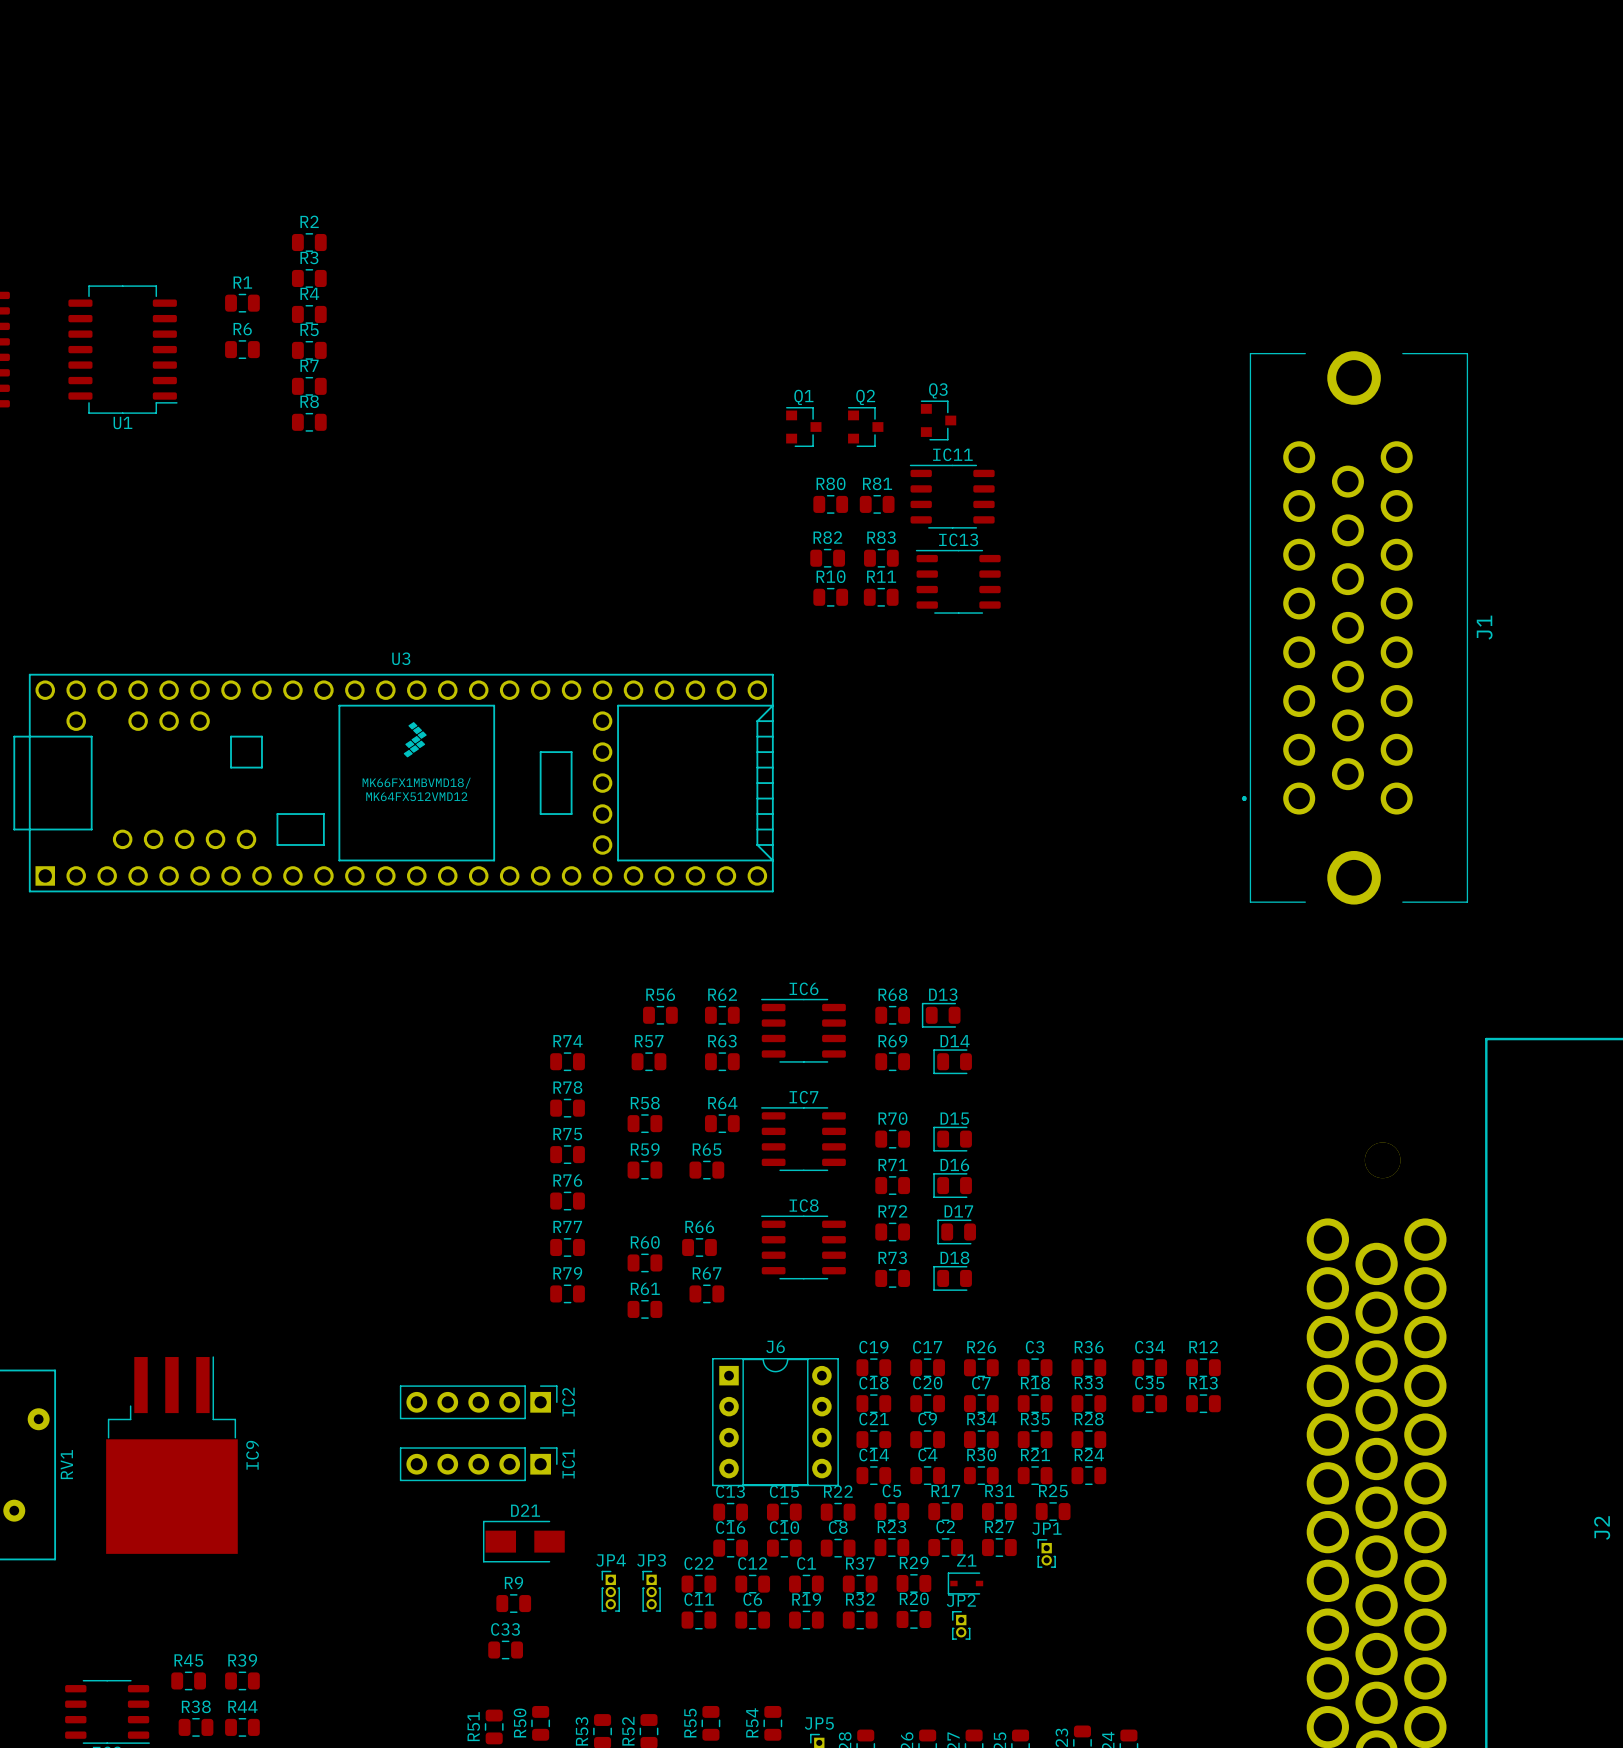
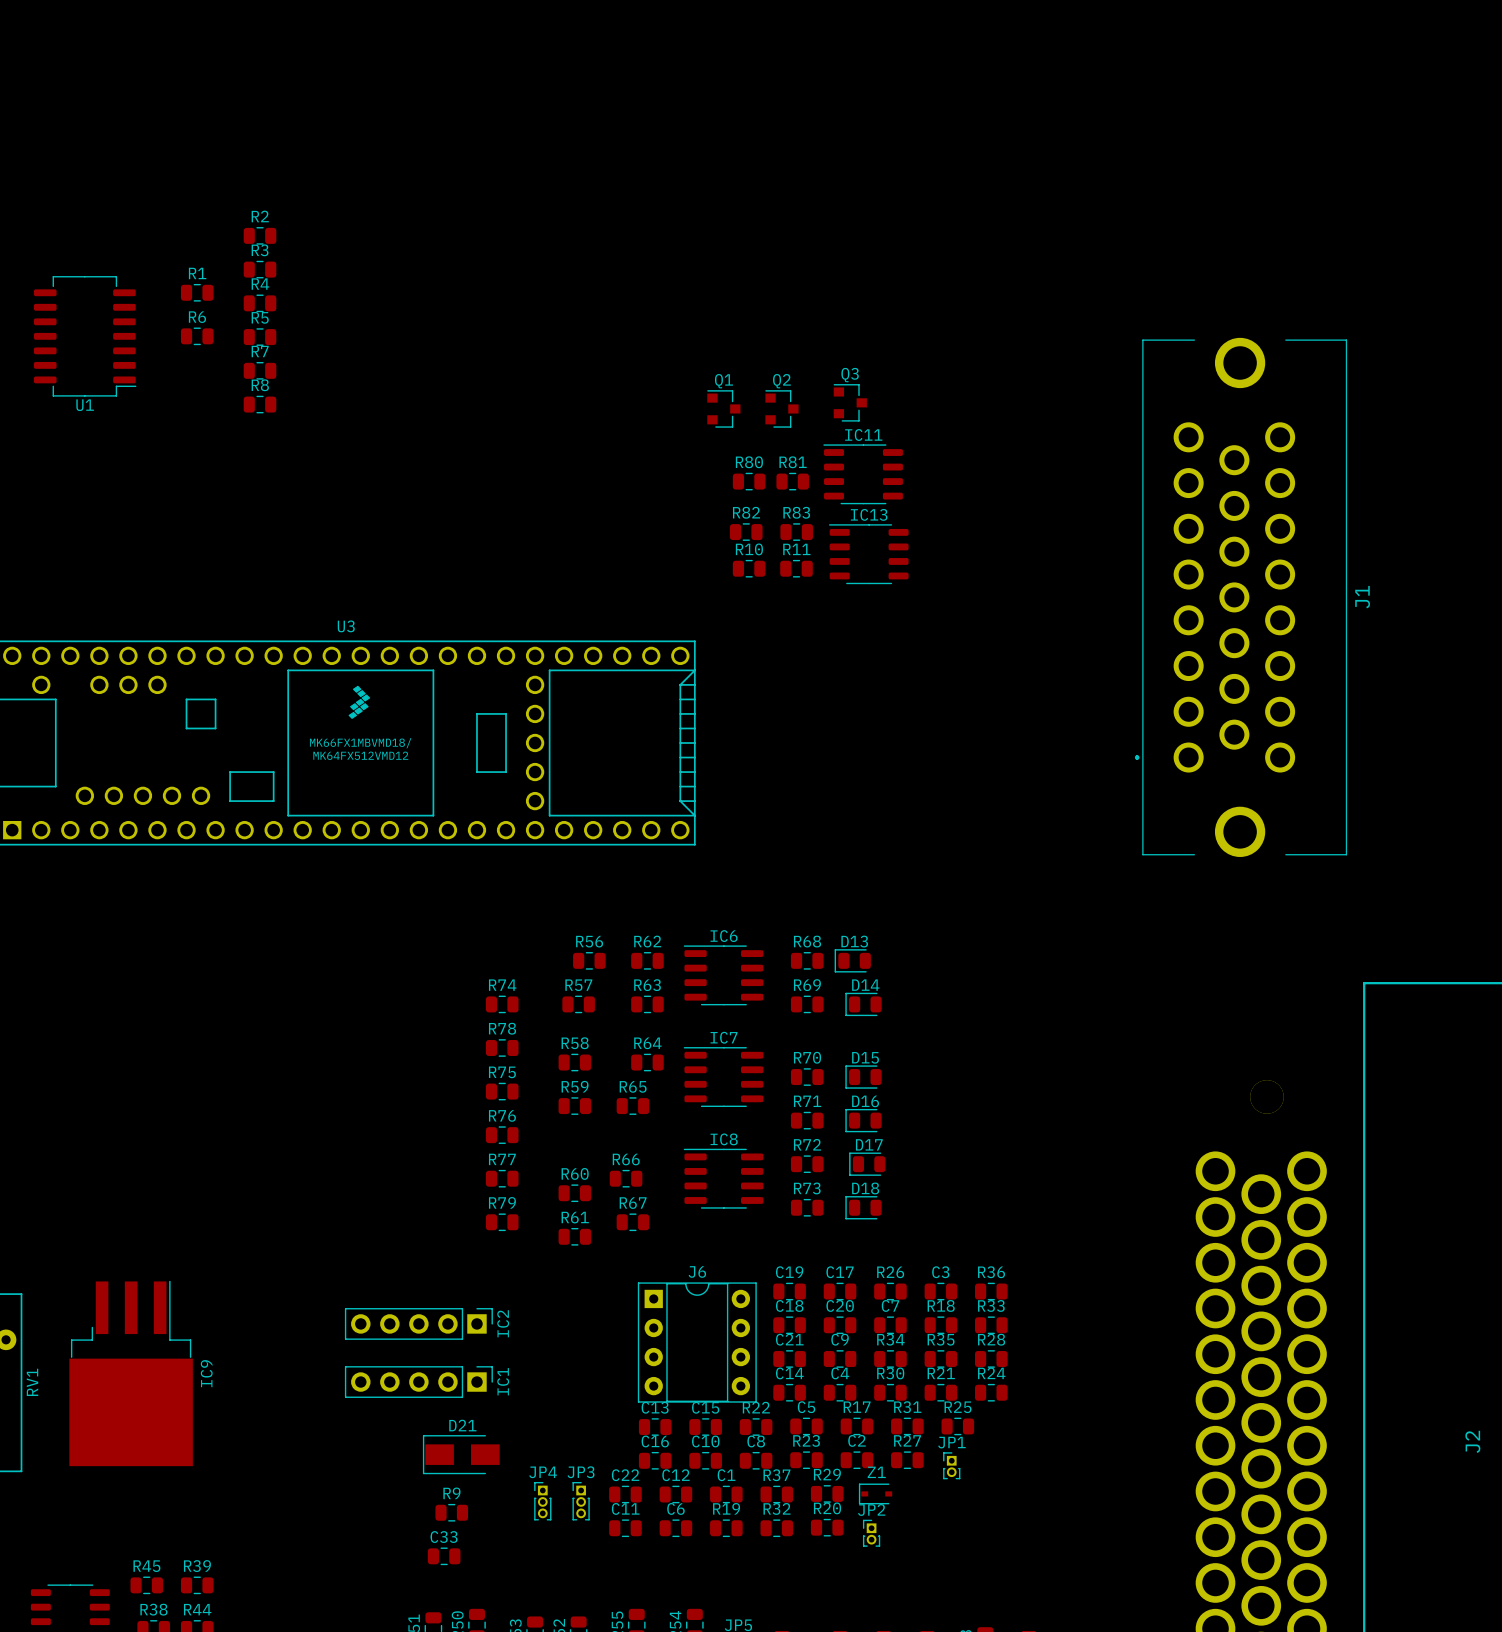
C34: (1149, 1367) -> none
R12: (1203, 1367) -> none
C35: (1149, 1403) -> none
R13: (1203, 1403) -> none

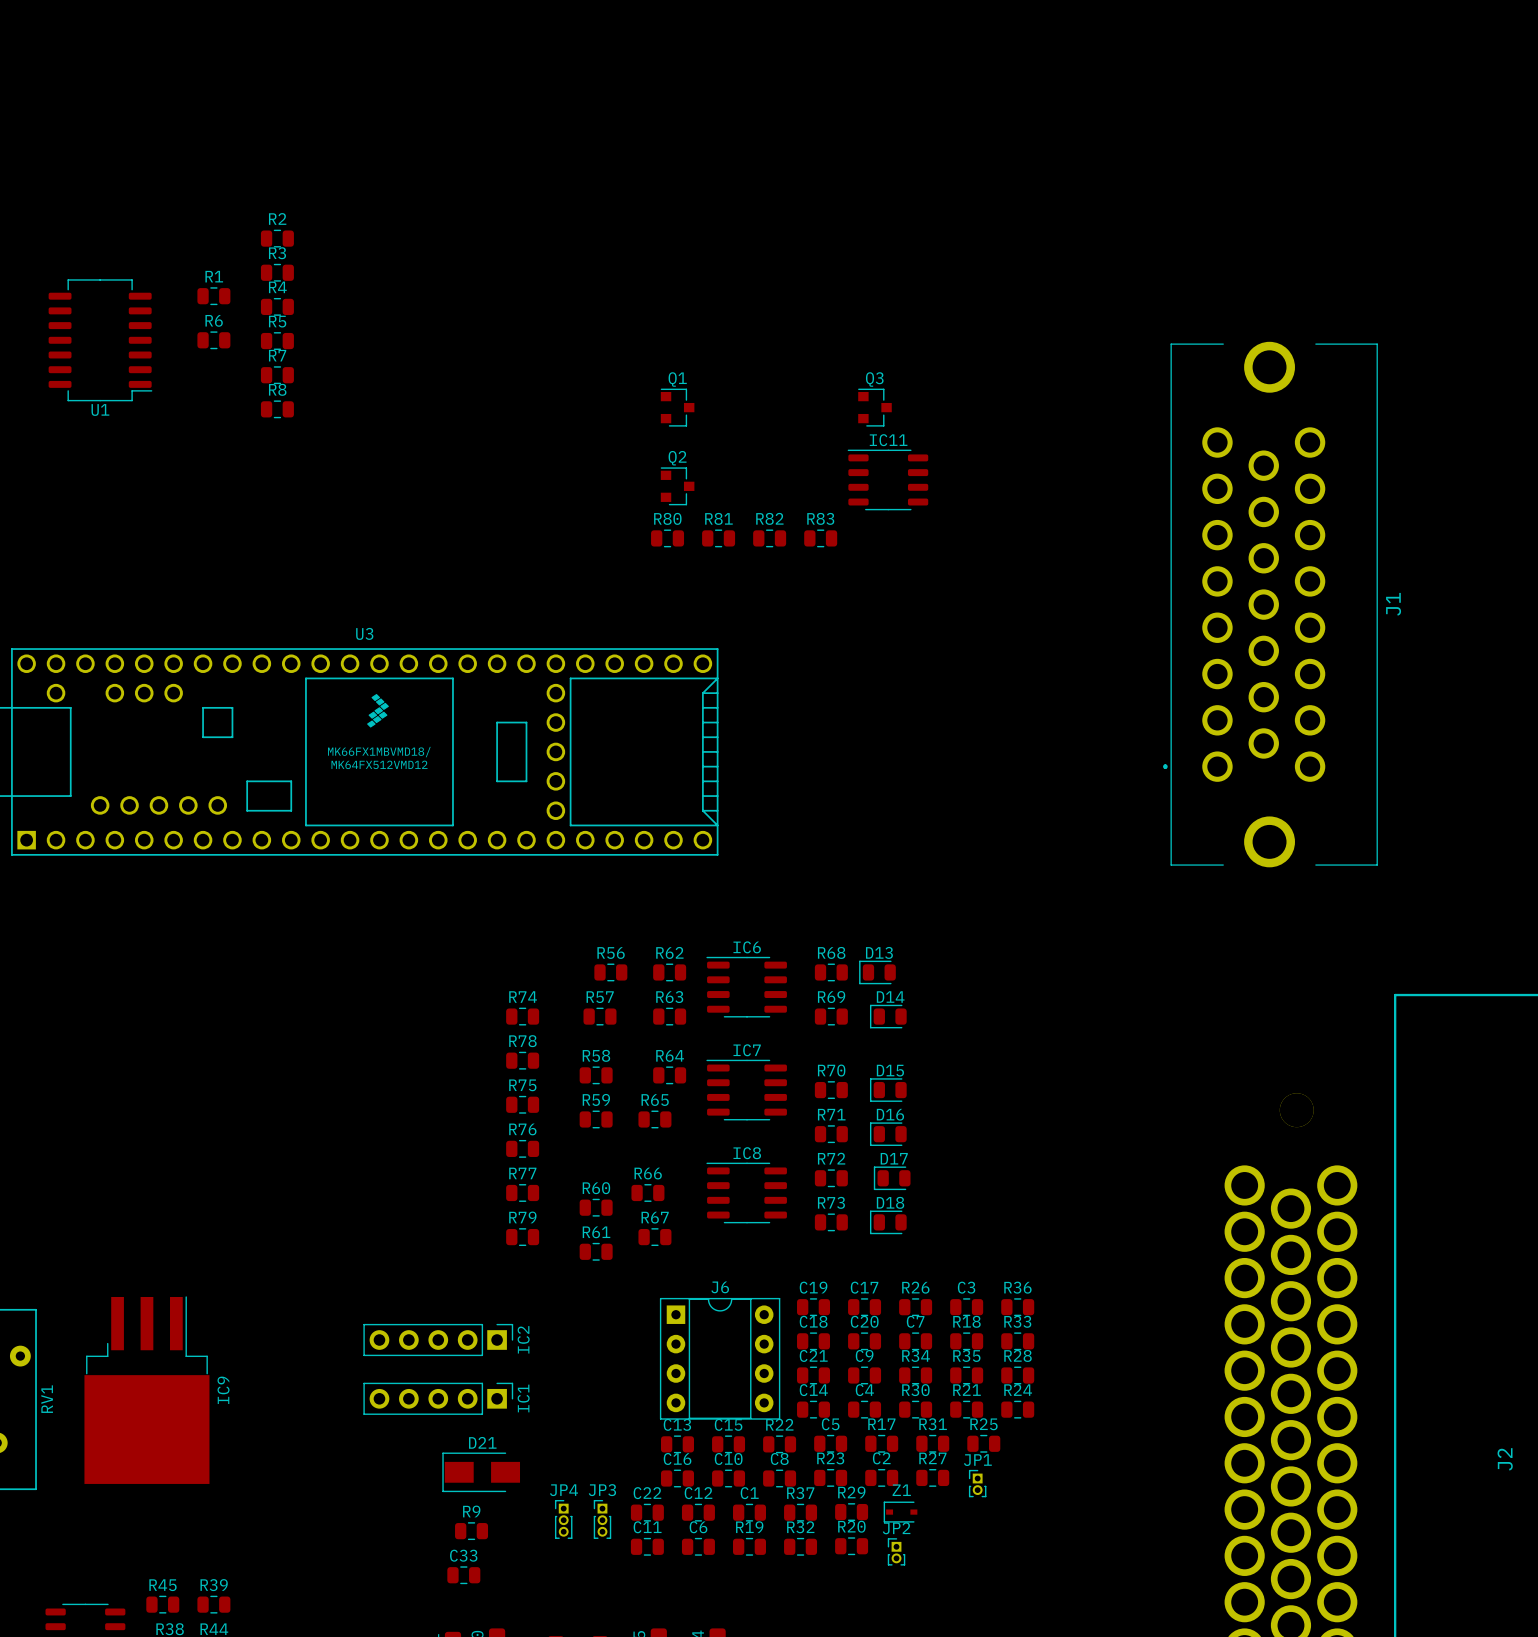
Q1 position: (723, 408) -> (677, 407)
Q2 position: (781, 408) -> (677, 486)
R80 position: (749, 481) -> (667, 538)
R81 position: (792, 481) -> (718, 538)
IC13: (868, 554) -> none
R10: (749, 568) -> none
R11: (796, 568) -> none

